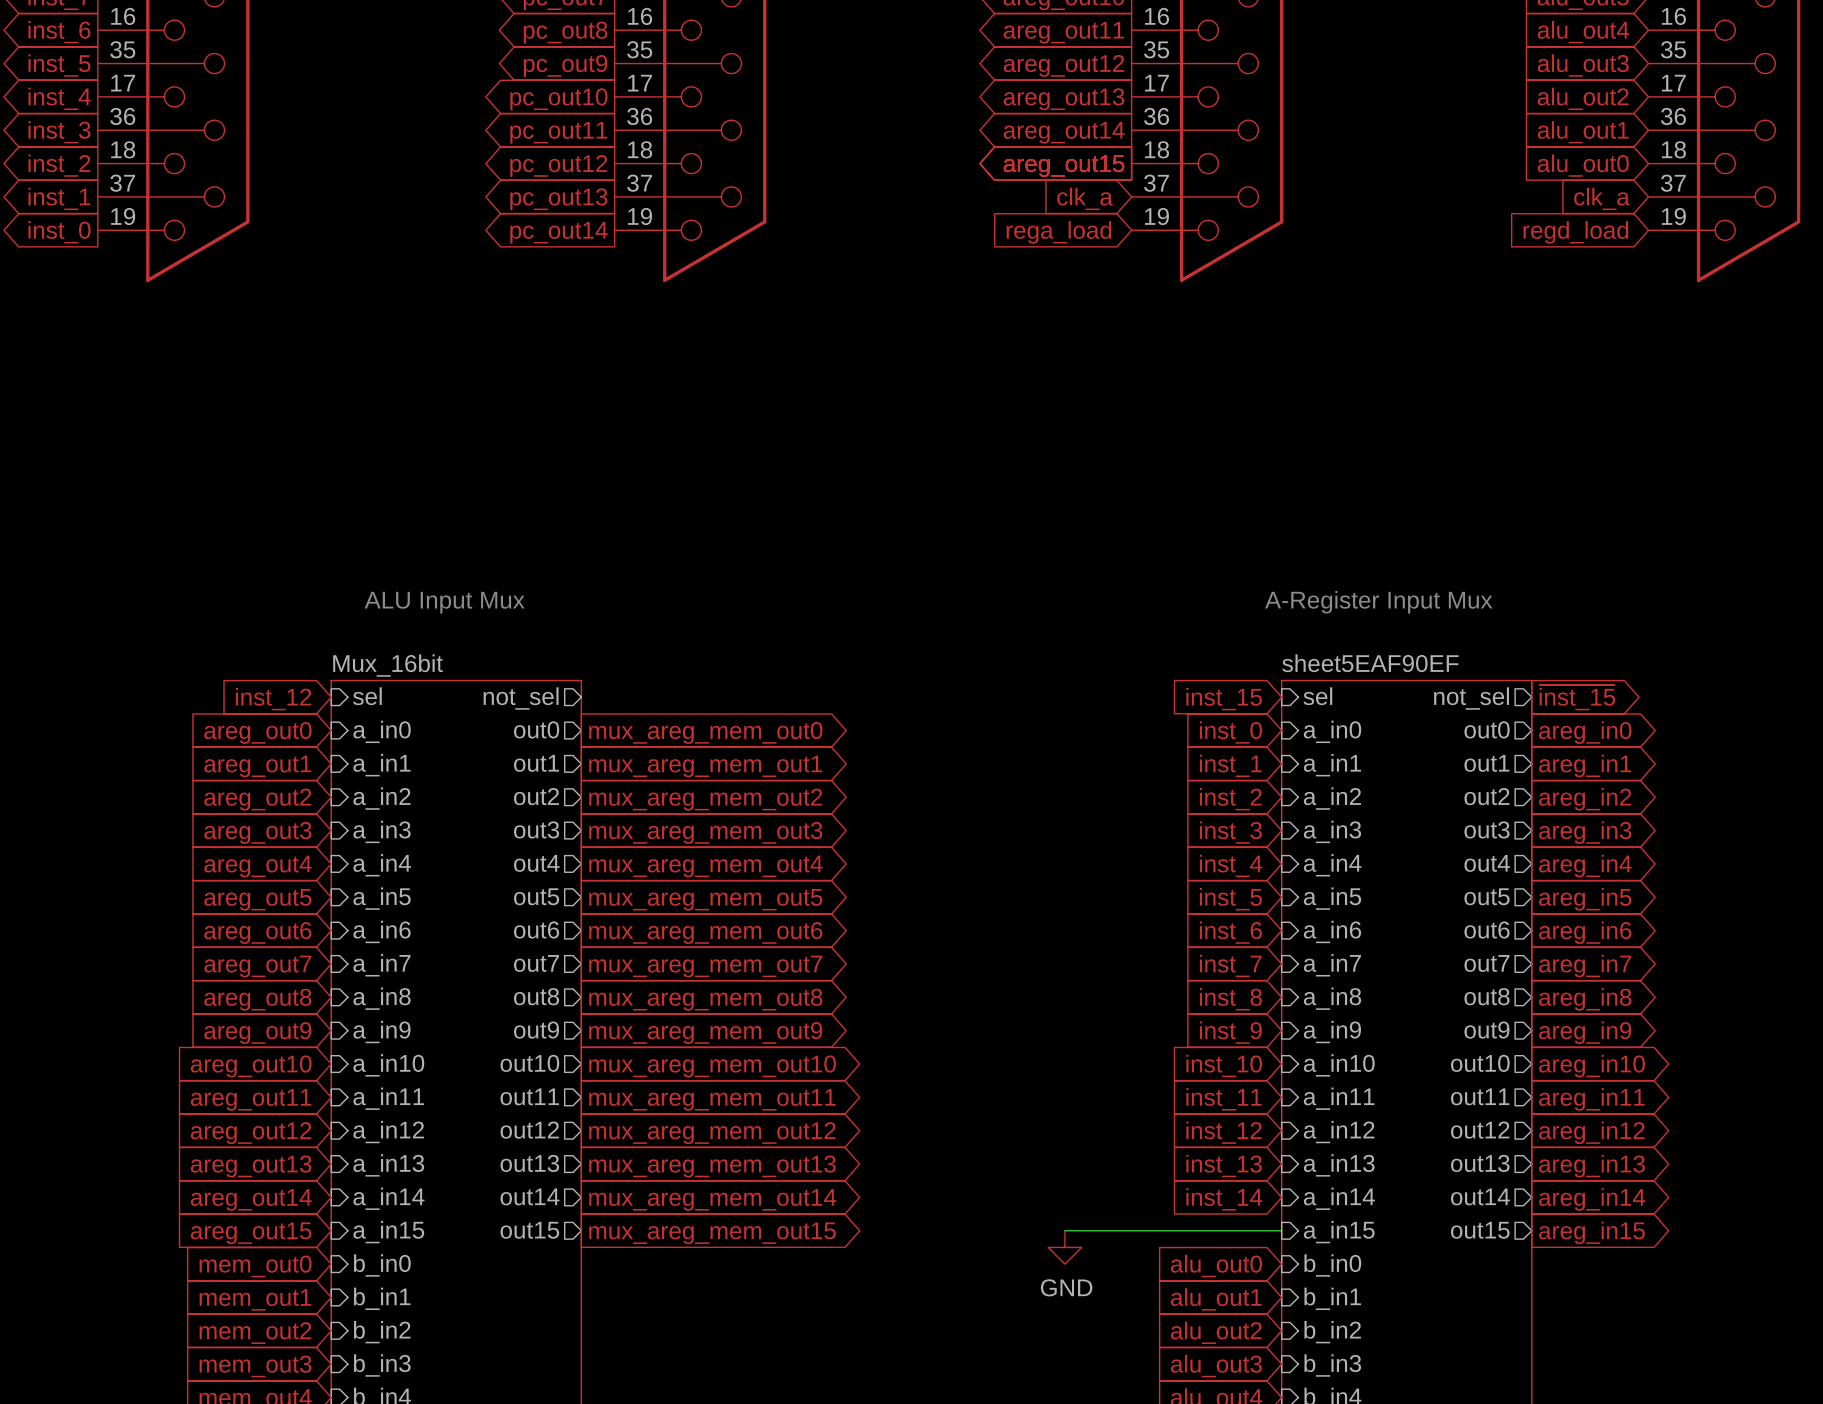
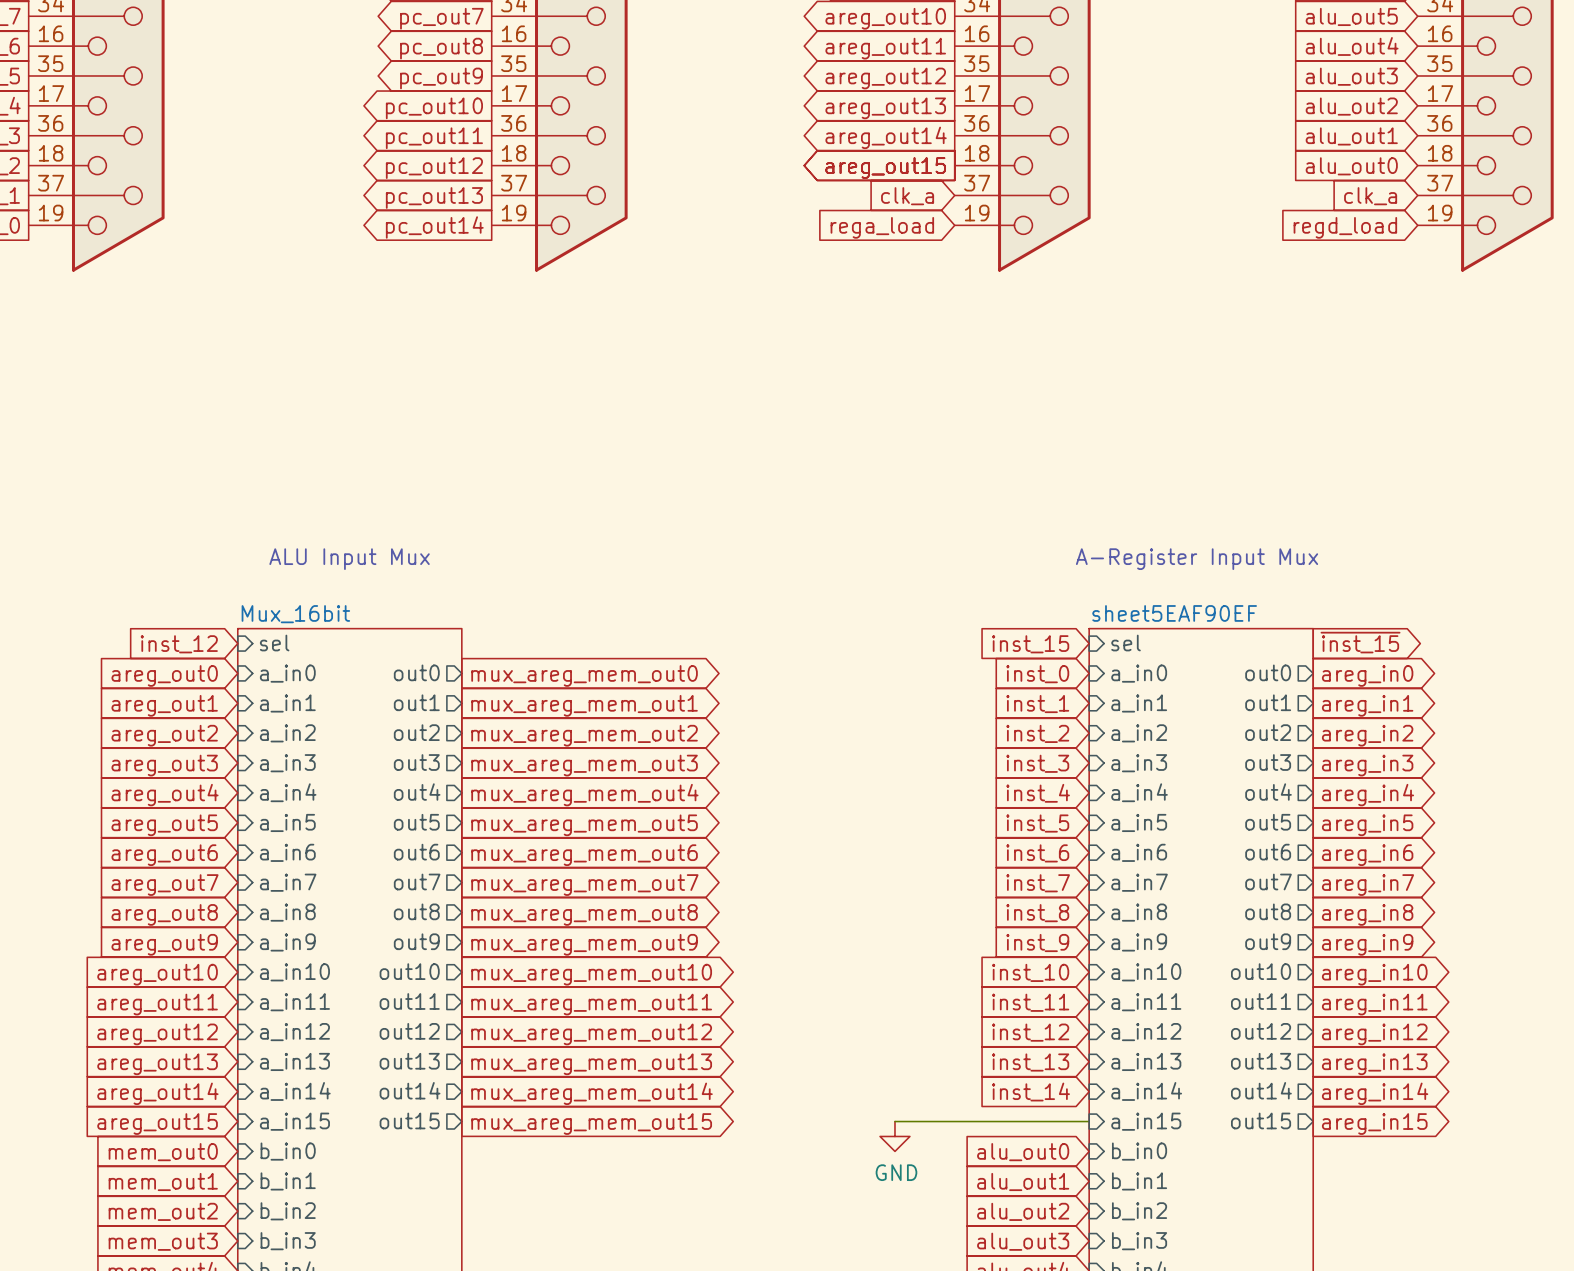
sheet pin: not_sel (521, 698) -> none
sheet pin: not_sel (1471, 698) -> none

